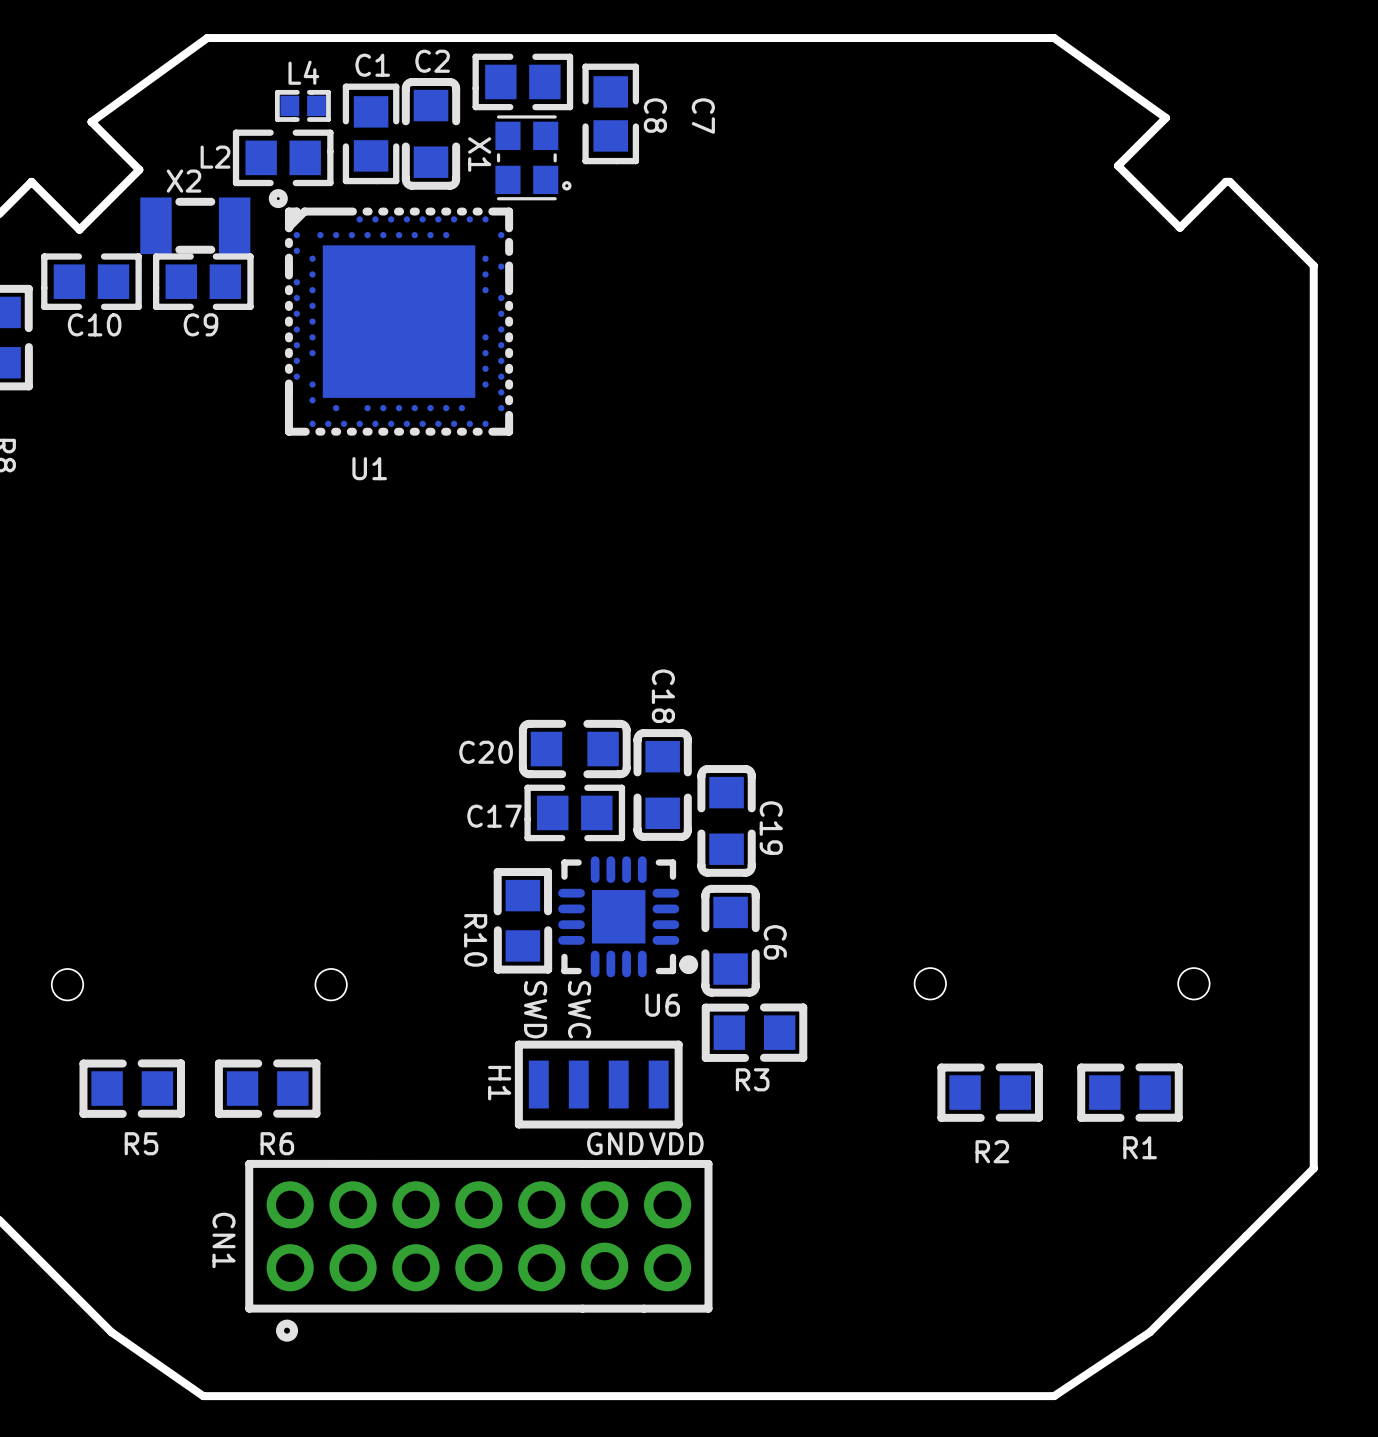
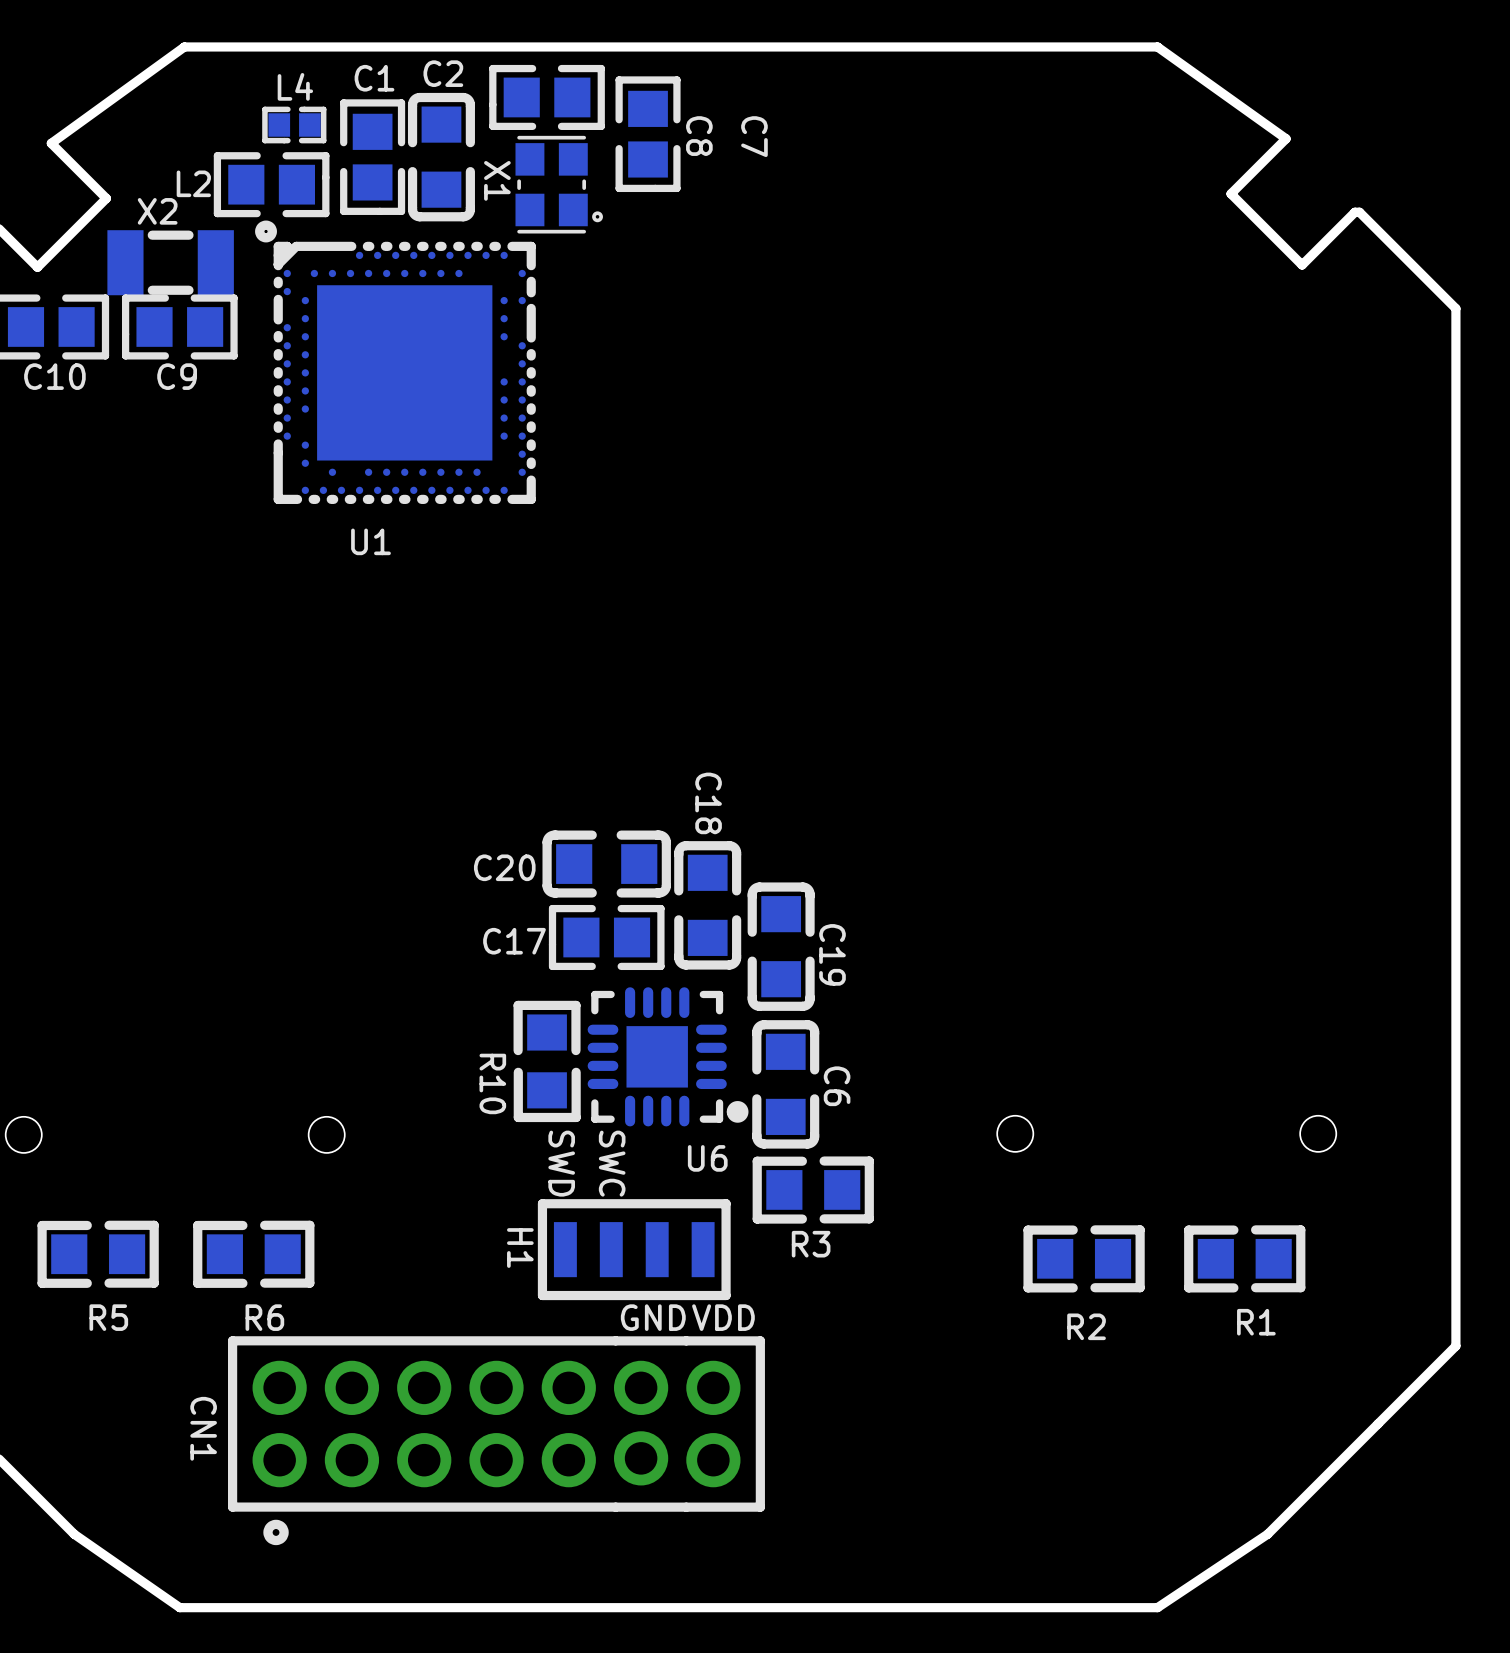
U1 footprint: [268, 189, 514, 436] -> [255, 220, 536, 504]

